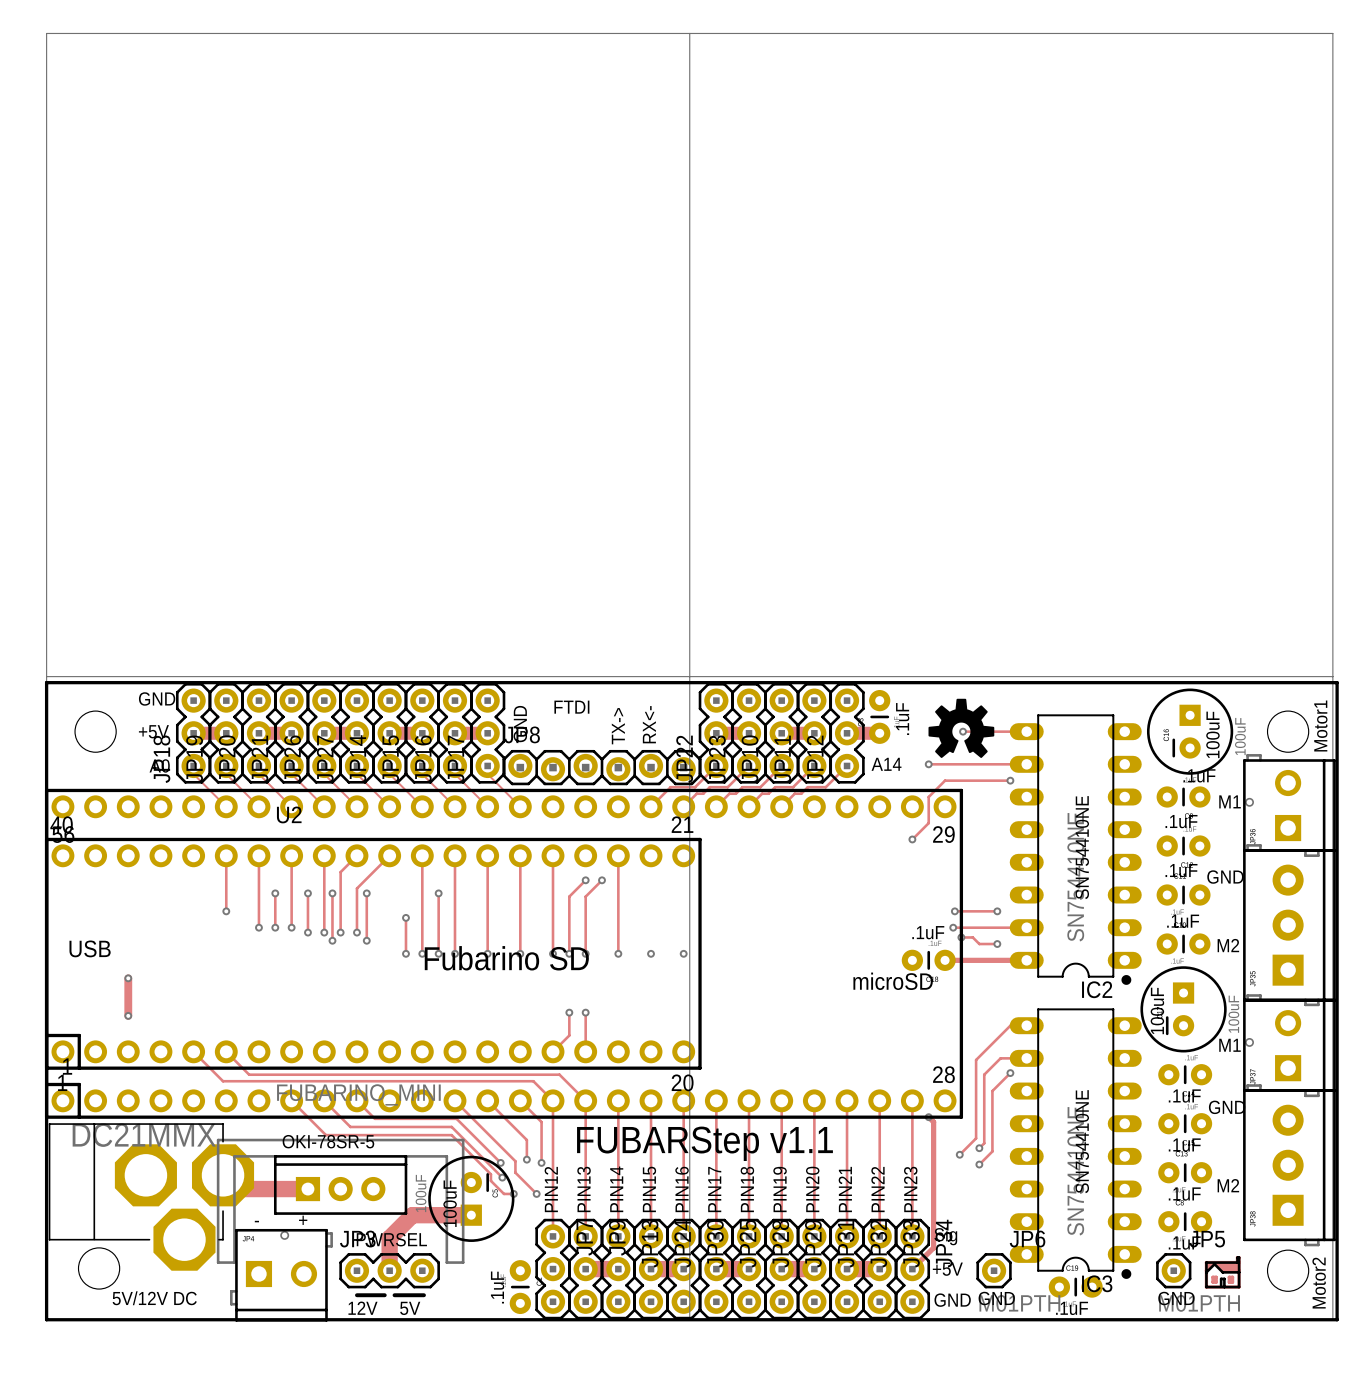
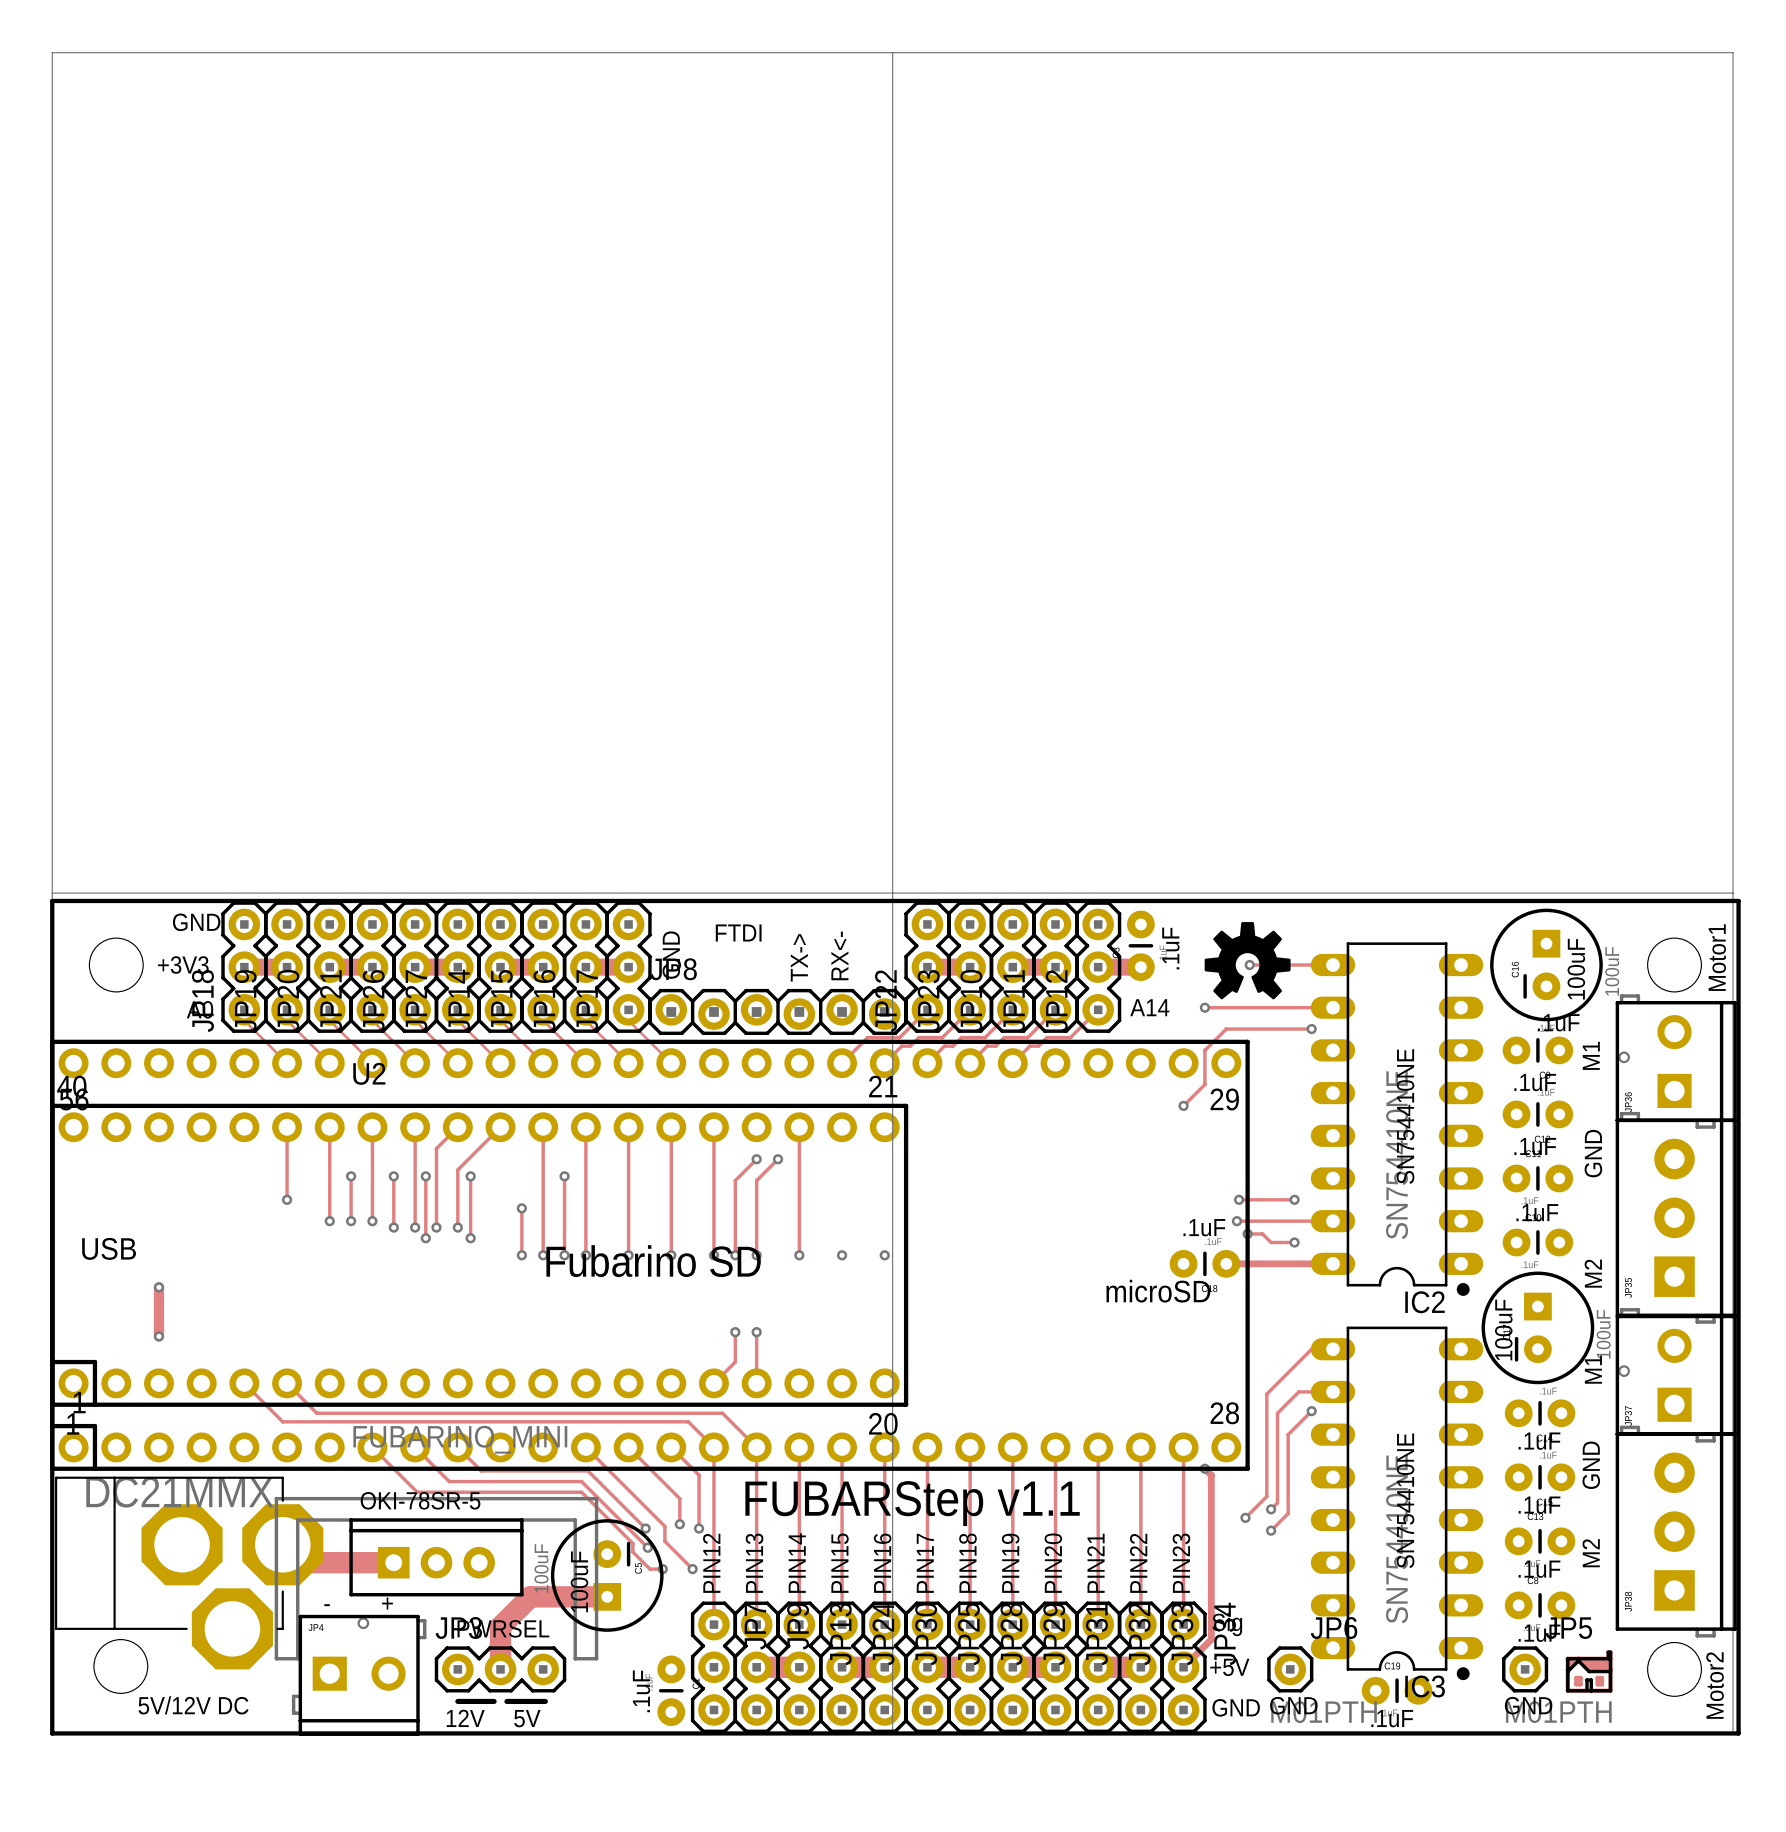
text: +5V (153, 731) -> +3V3 (183, 965)
text rotation: 0° (1230, 801) -> 90° counterclockwise (1591, 1055)
text rotation: 0° (1225, 877) -> 90° counterclockwise (1593, 1153)
text rotation: 0° (1228, 945) -> 90° counterclockwise (1593, 1273)
text rotation: 0° (1230, 1045) -> 90° counterclockwise (1593, 1369)
text rotation: 0° (1227, 1107) -> 90° counterclockwise (1591, 1465)
text rotation: 0° (1228, 1185) -> 90° counterclockwise (1591, 1553)

